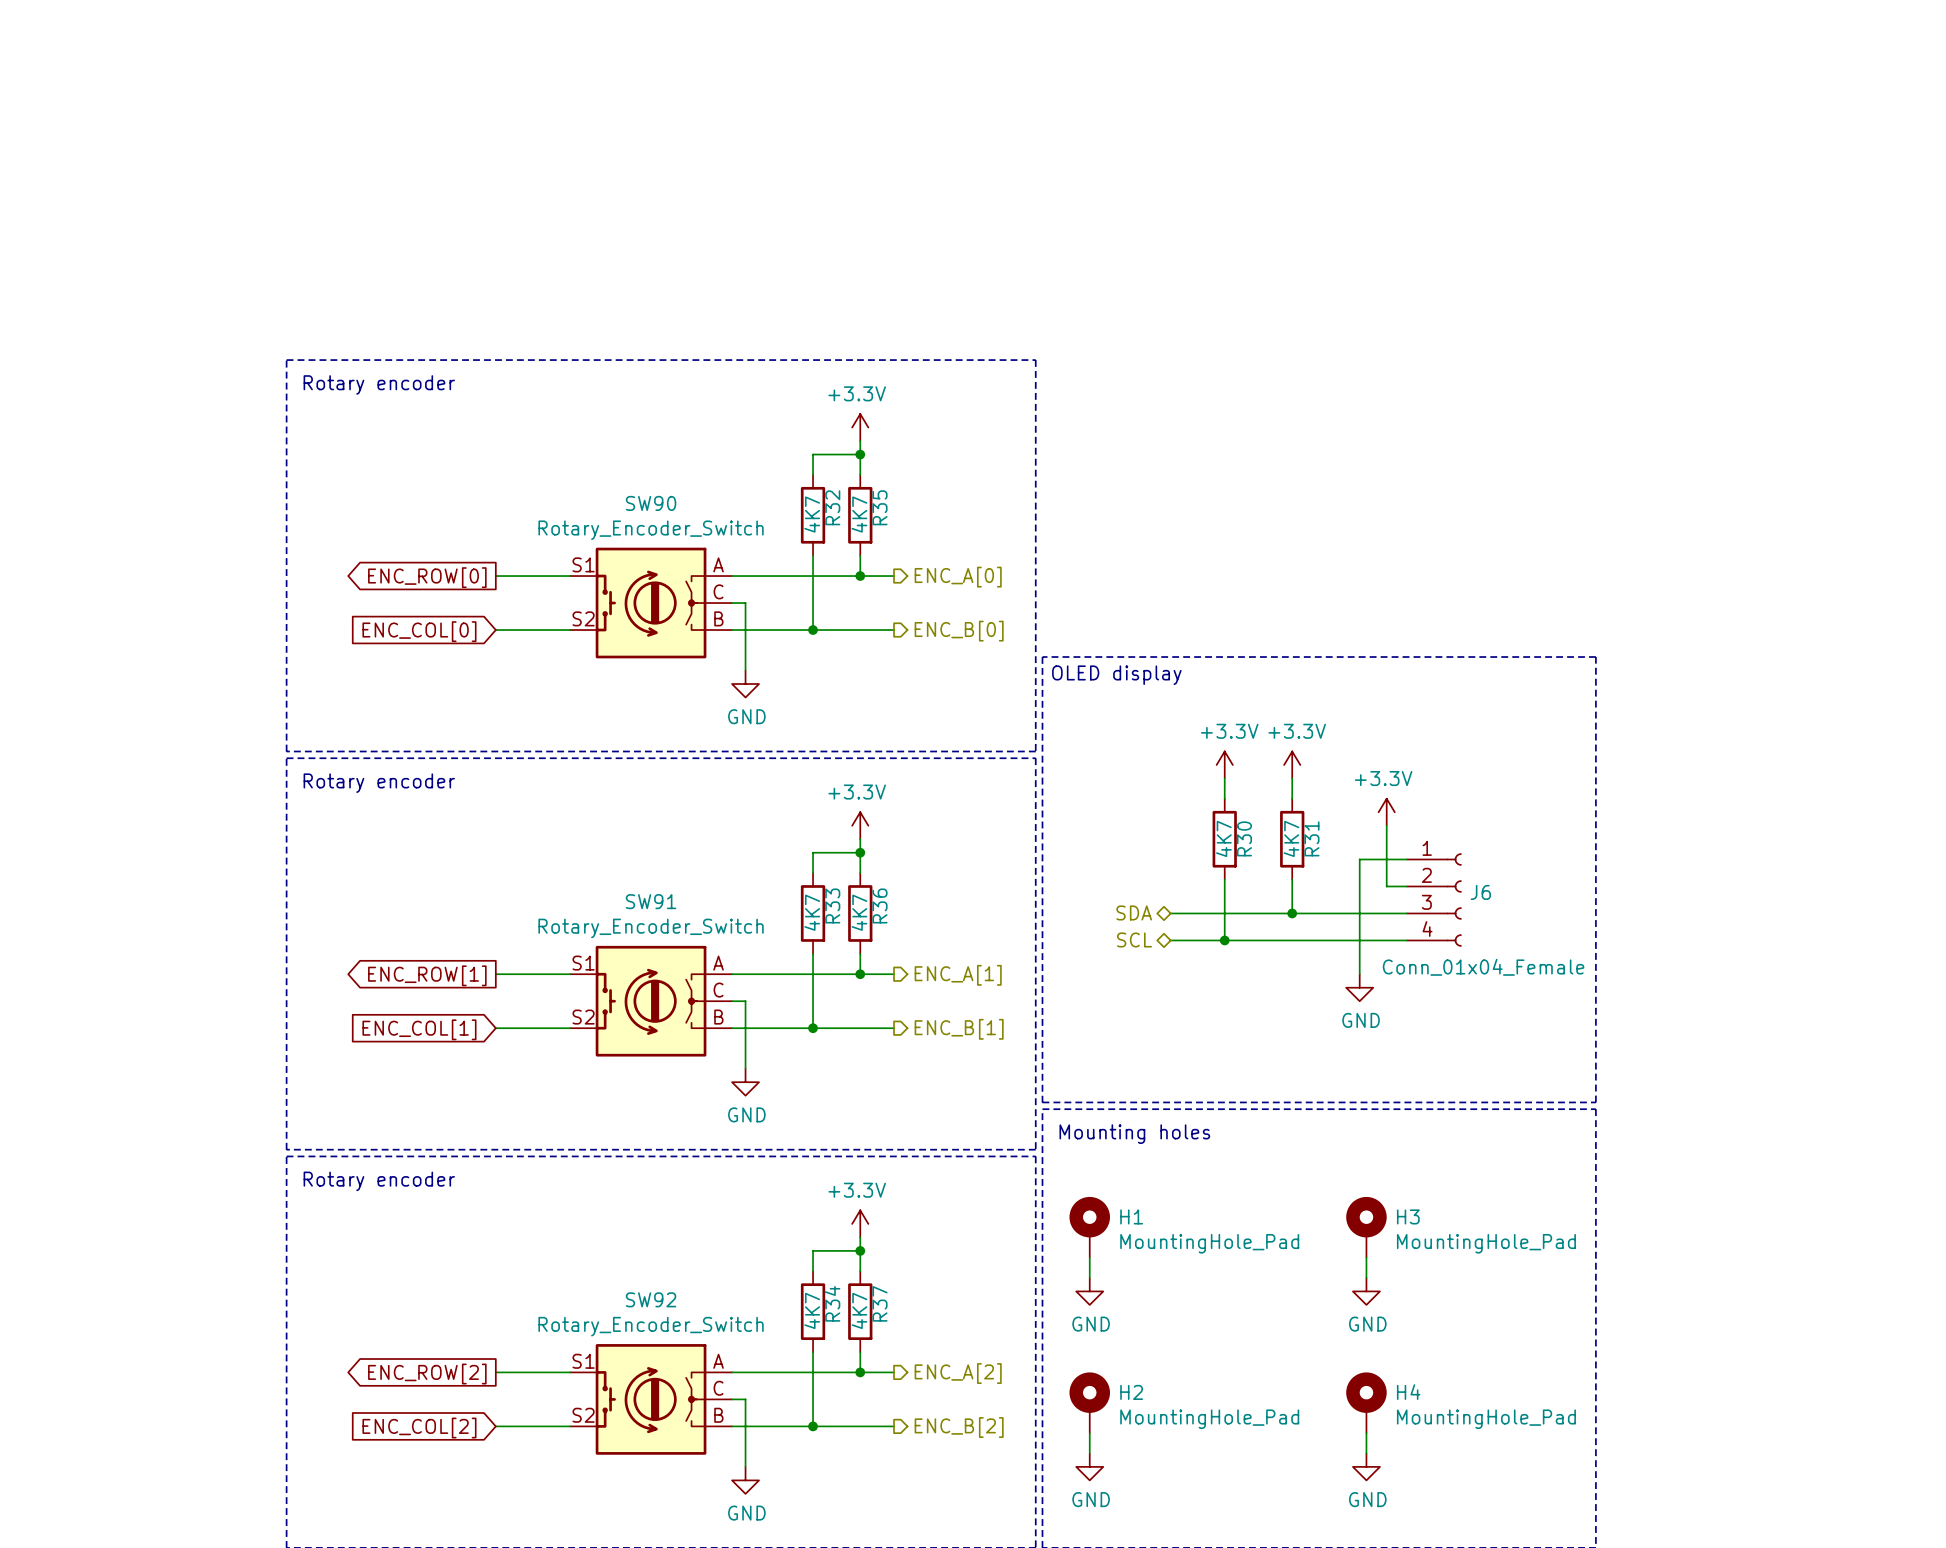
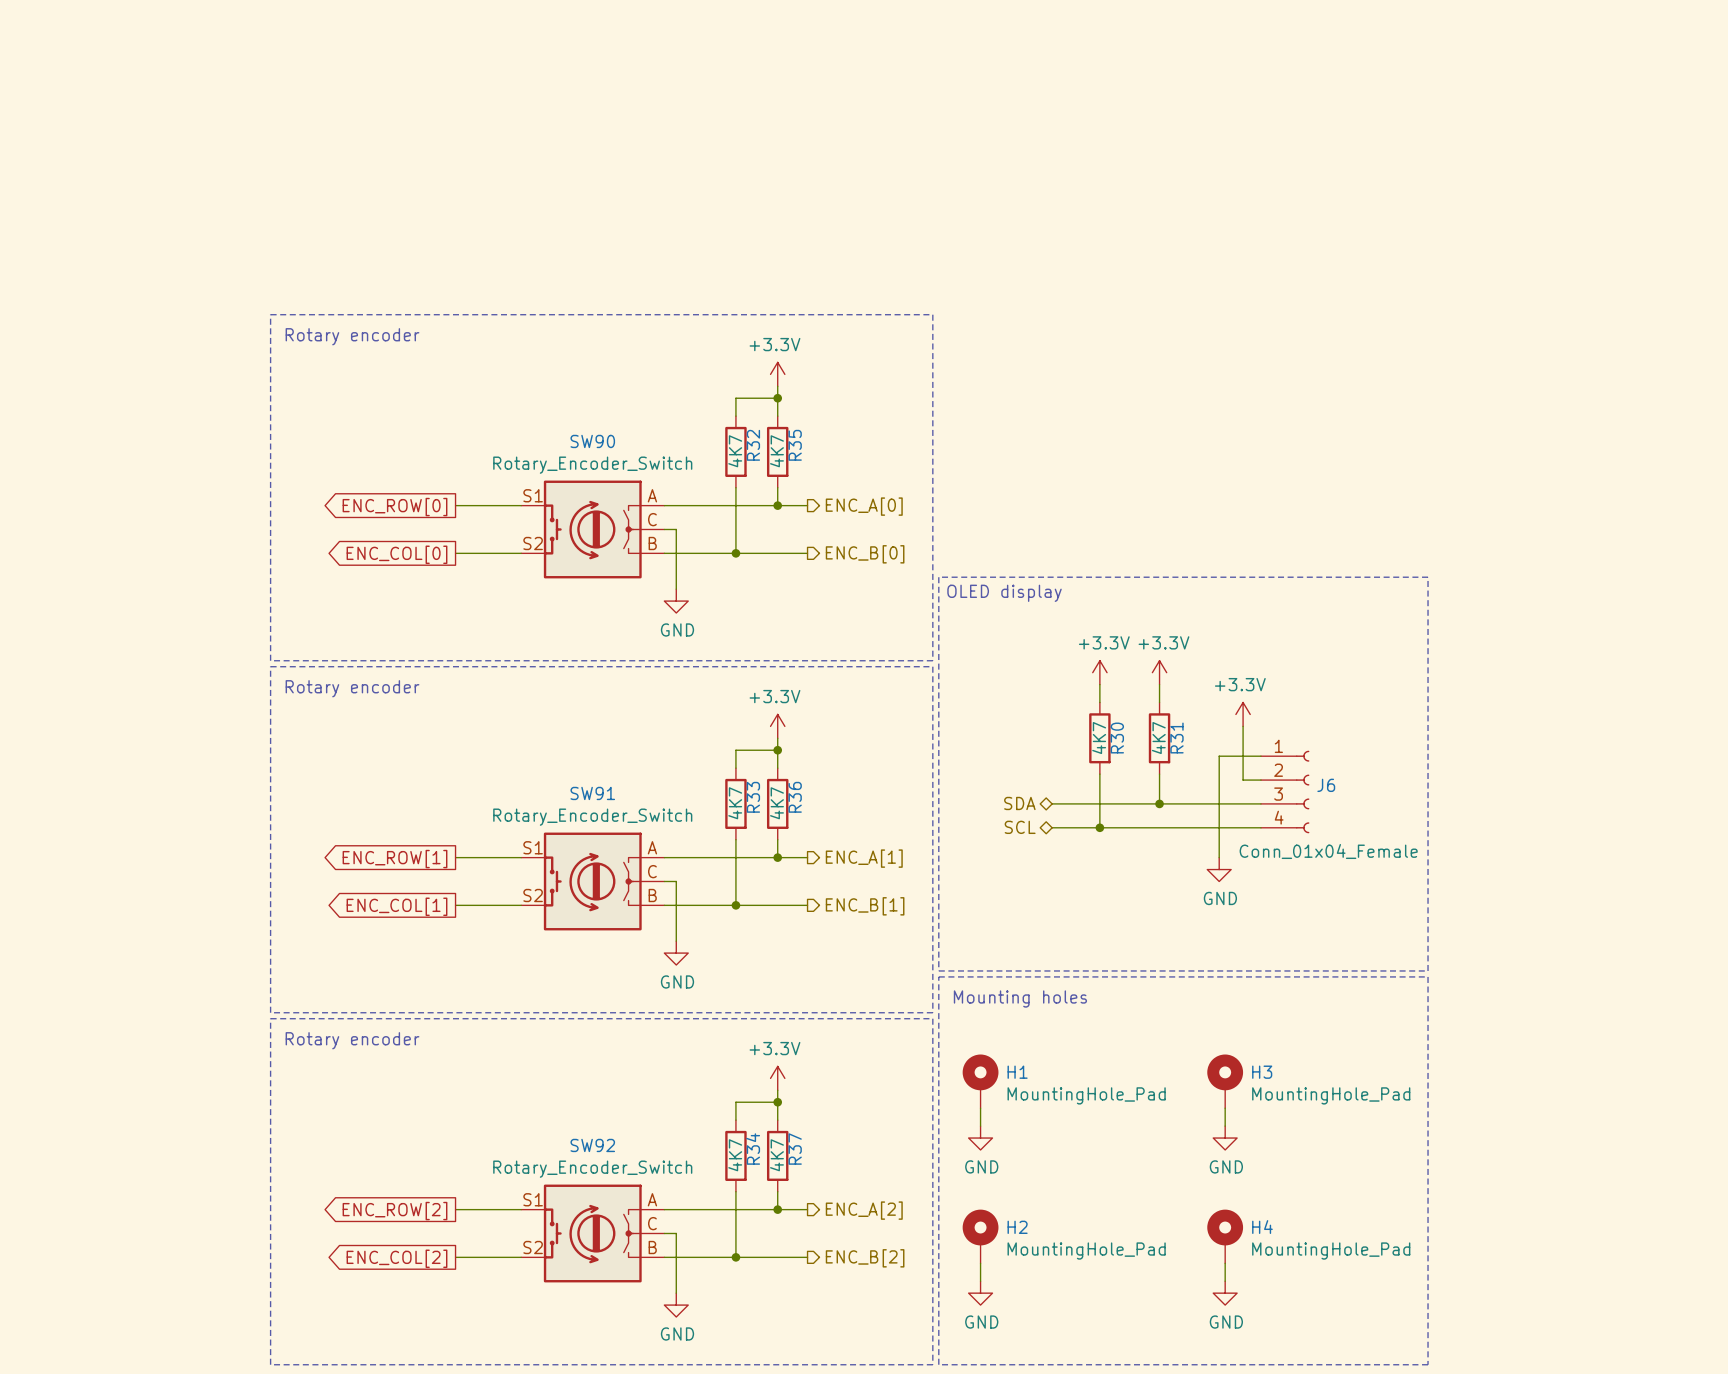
global label shape: input (419, 631) -> output (397, 554)
global label shape: input (419, 1029) -> output (397, 906)
global label shape: input (419, 1428) -> output (397, 1258)

